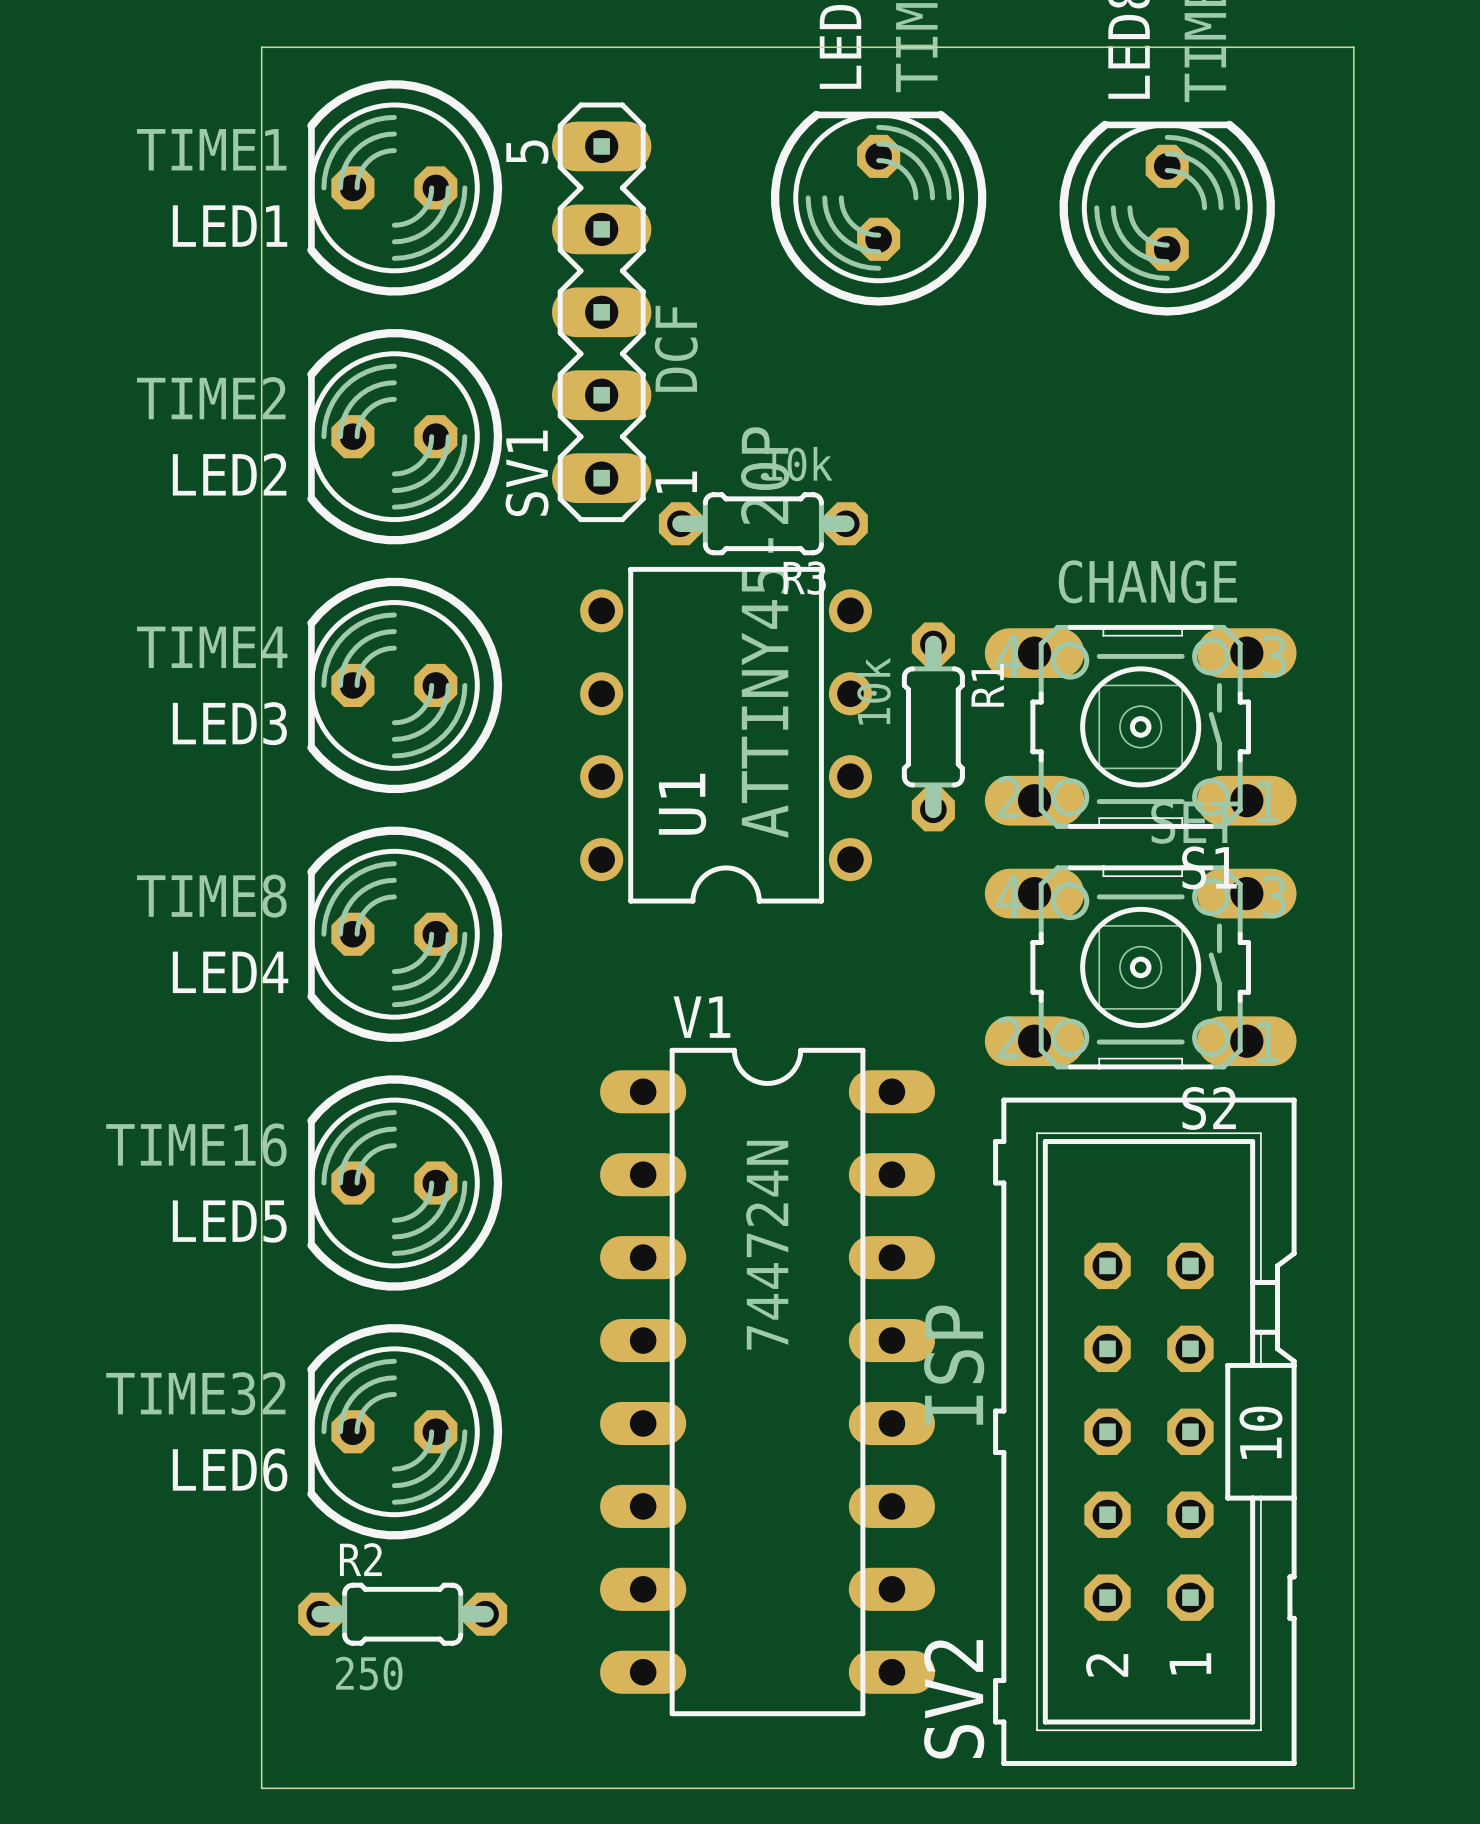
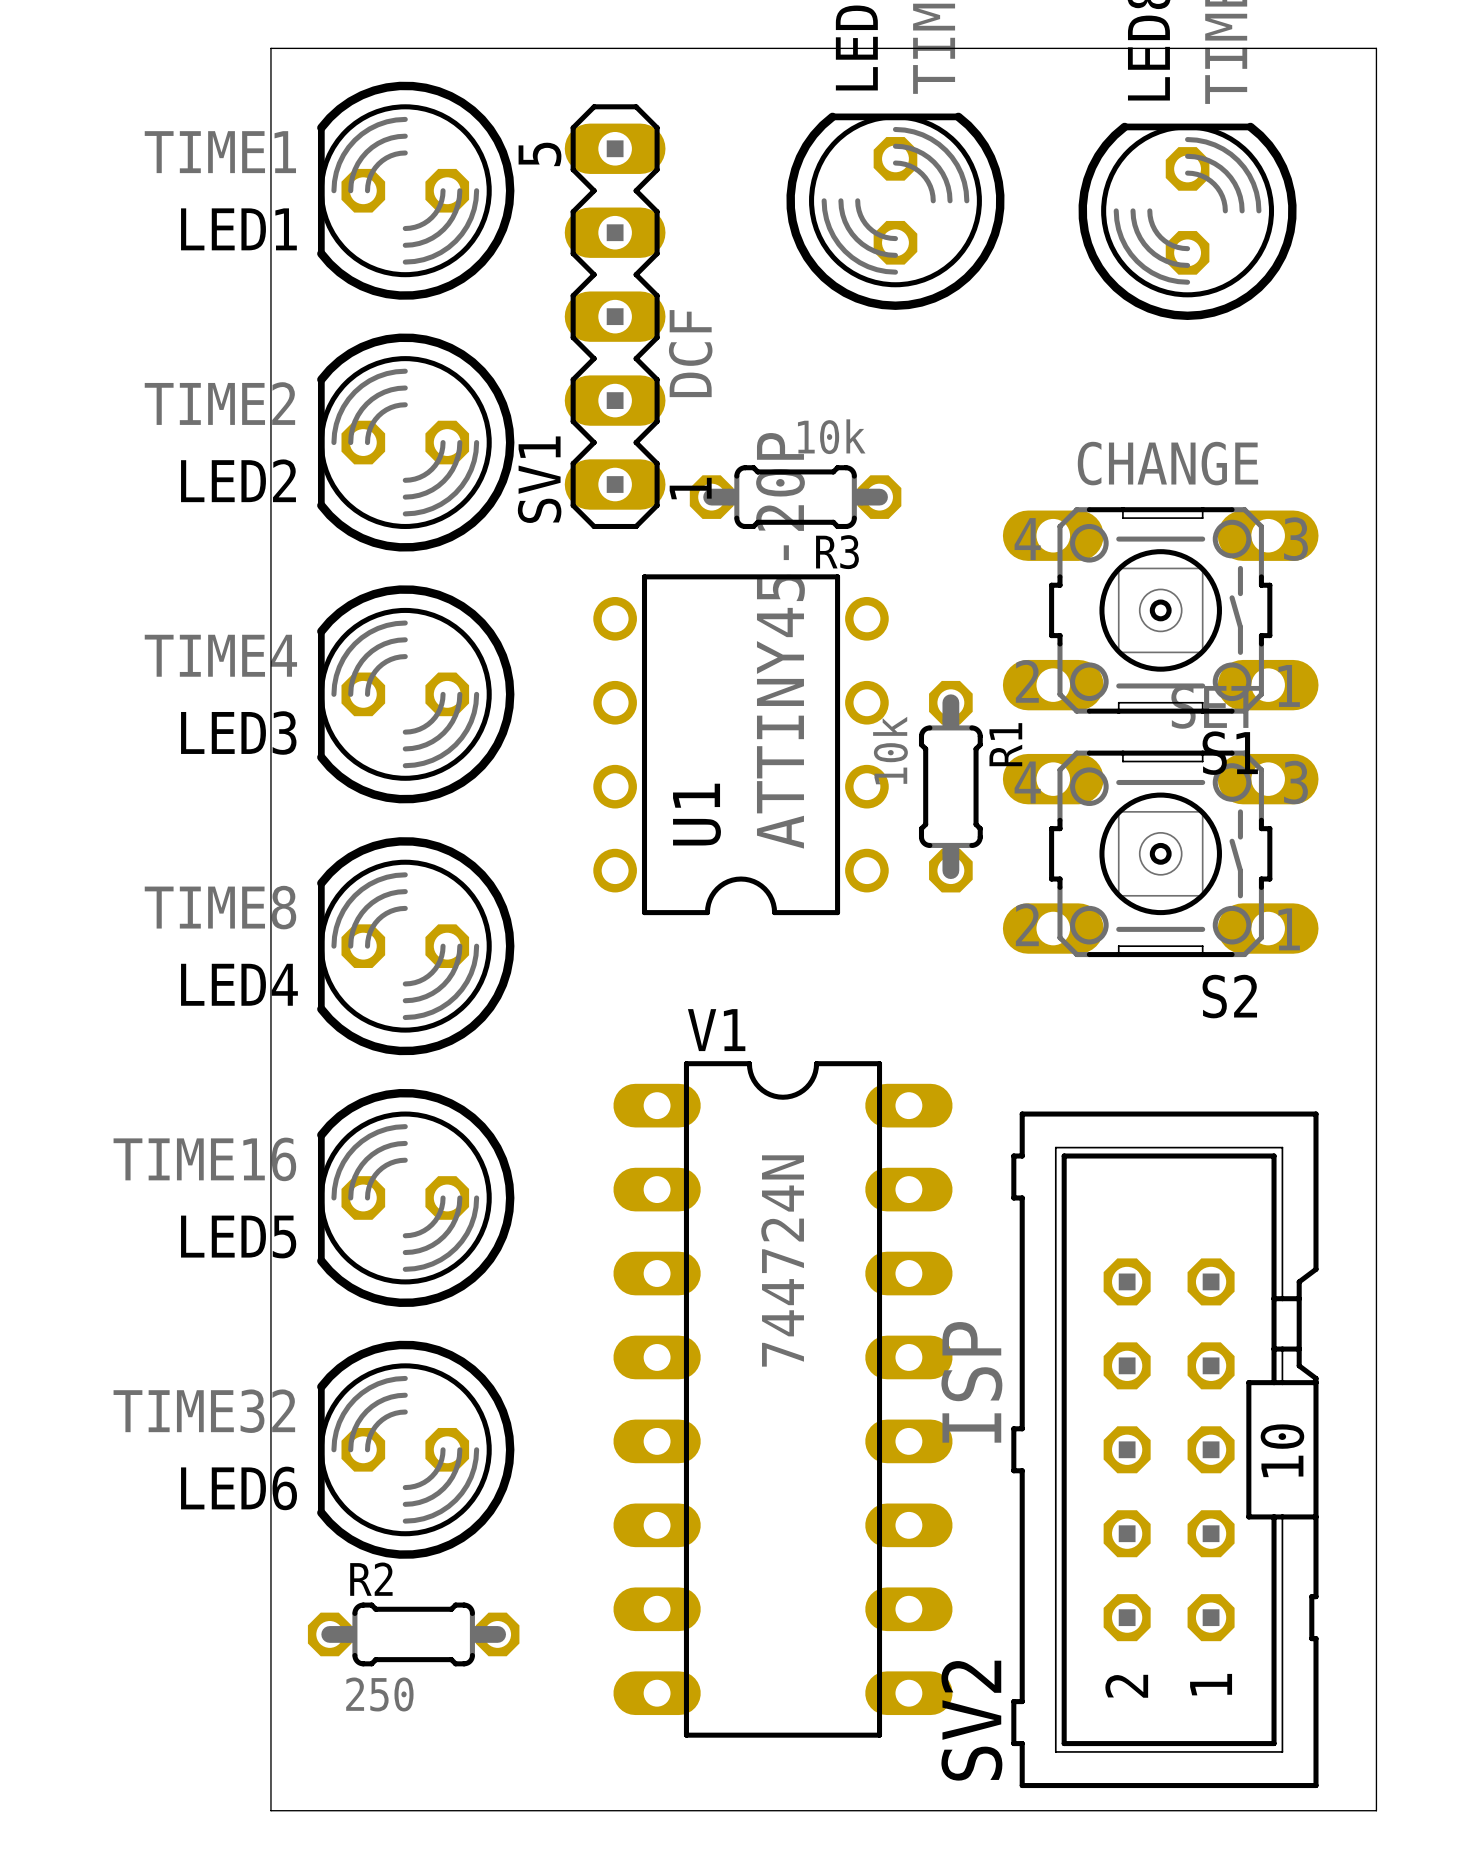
R3 position: (763, 523) -> (795, 497)
R1 position: (933, 726) -> (950, 786)
S1 position: (1140, 726) -> (1160, 610)
S2 position: (1140, 967) -> (1160, 853)

